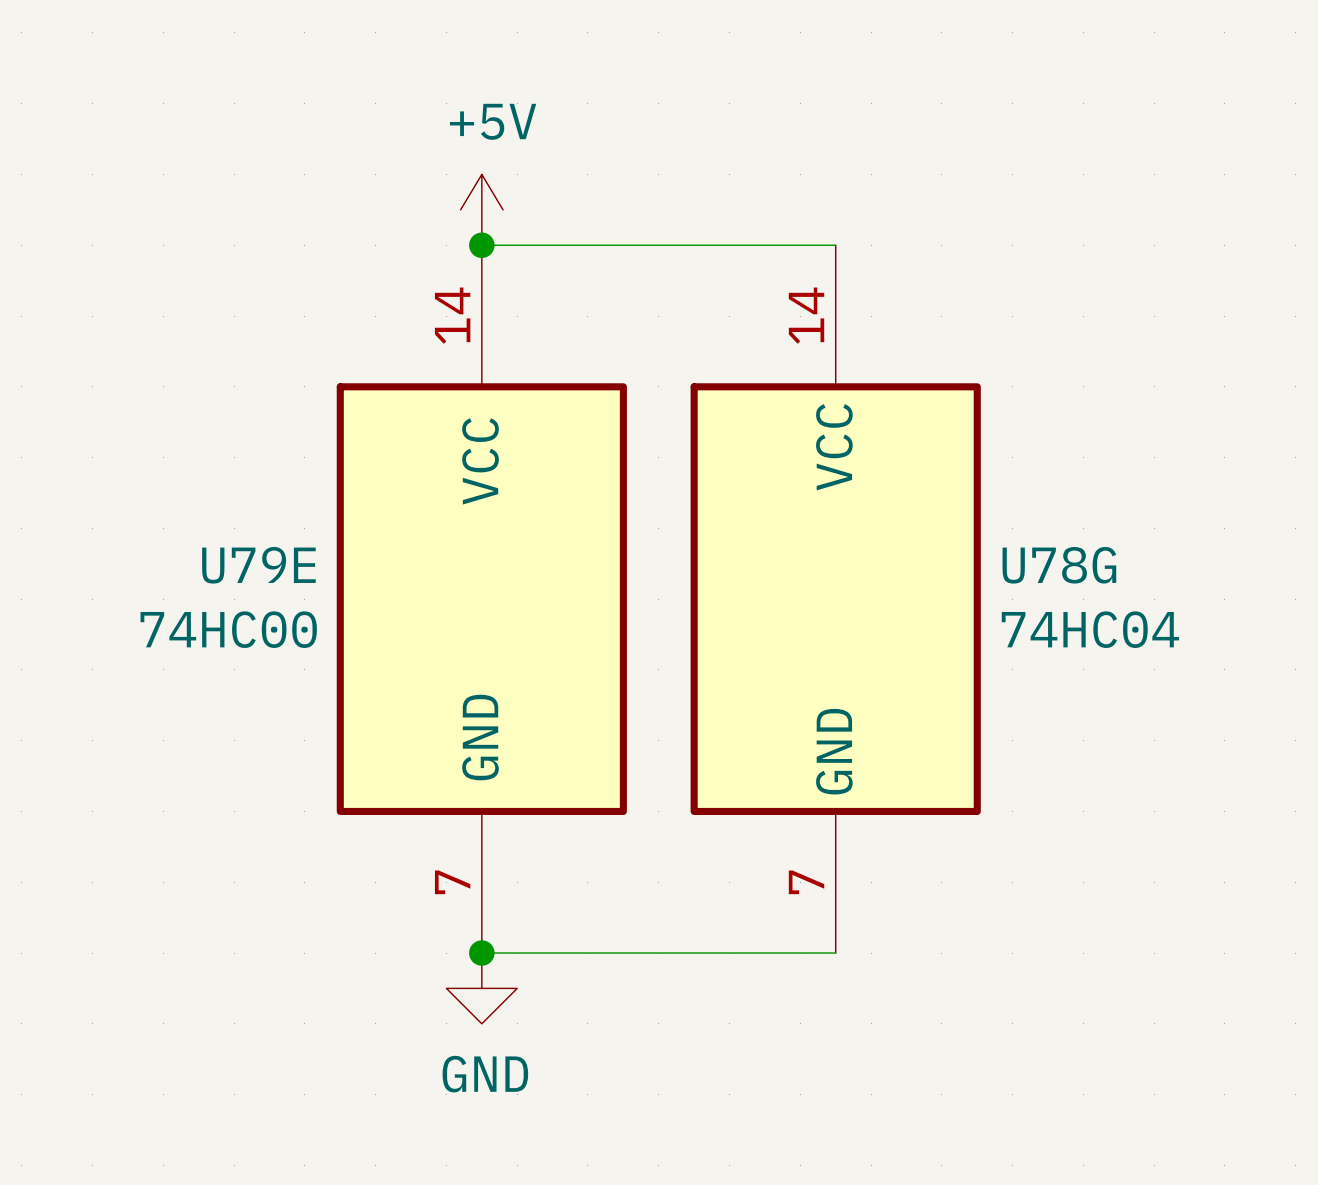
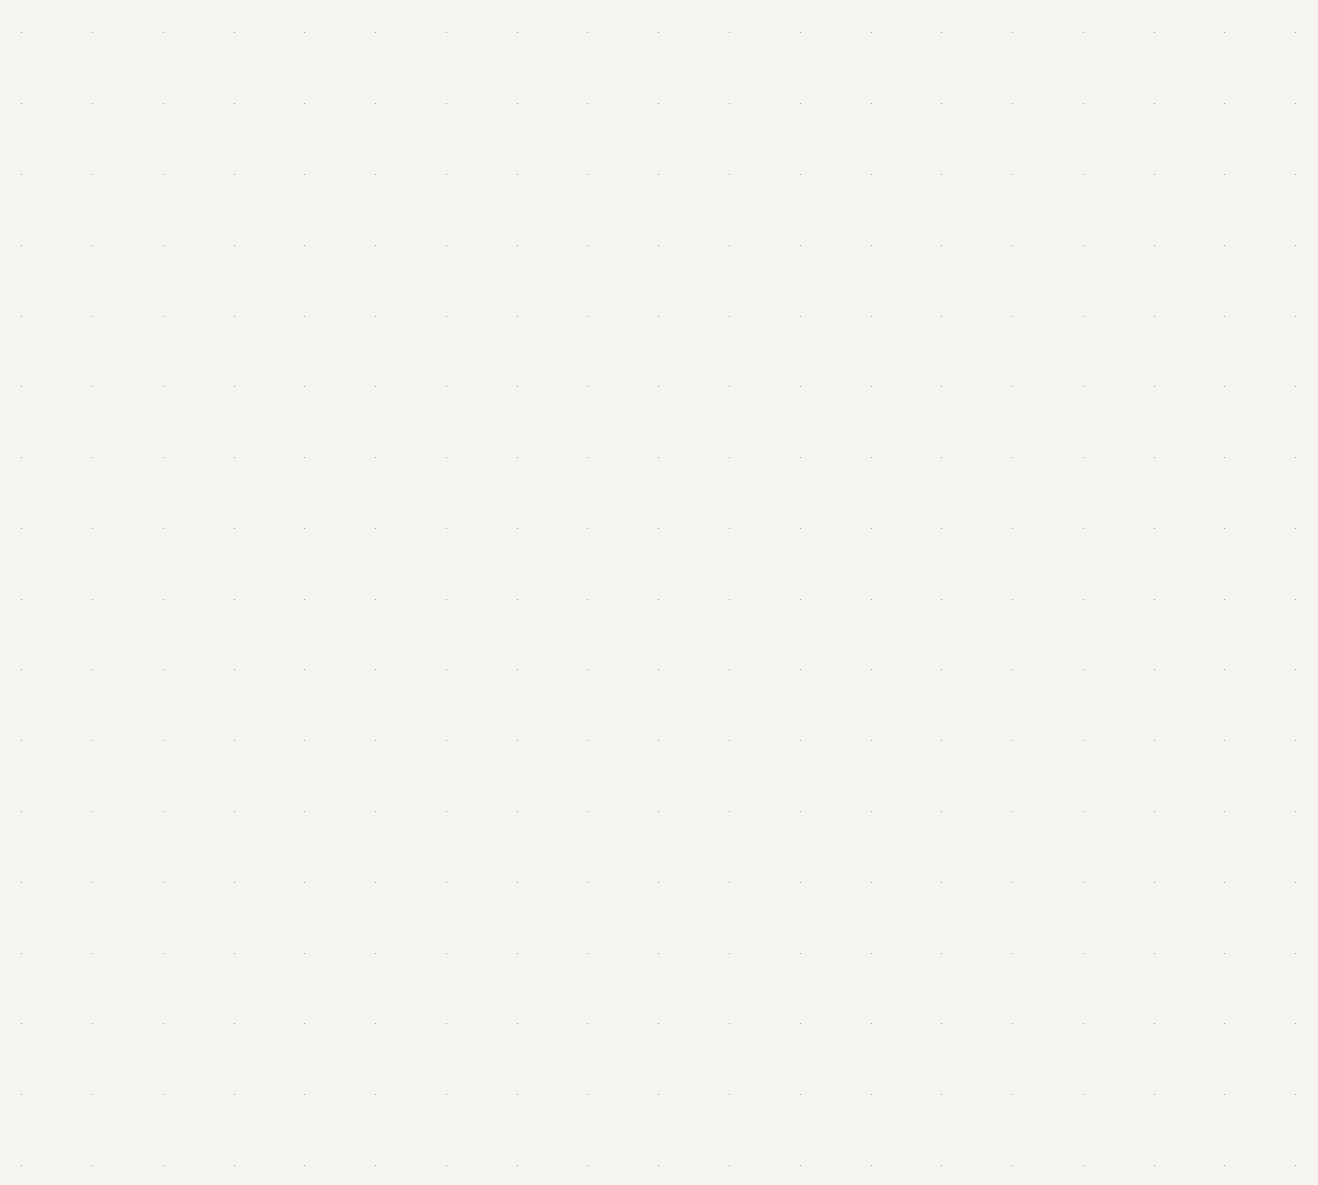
power symbol: +5V (481, 209) -> none
wire: (481, 245) (835, 245) -> none
junction: (481, 245) -> none
U79E: 74HC00 (481, 599) -> none
U78G: 74HC04 (835, 599) -> none
wire: (481, 953) (835, 953) -> none
junction: (481, 953) -> none
power symbol: GND (481, 988) -> none

